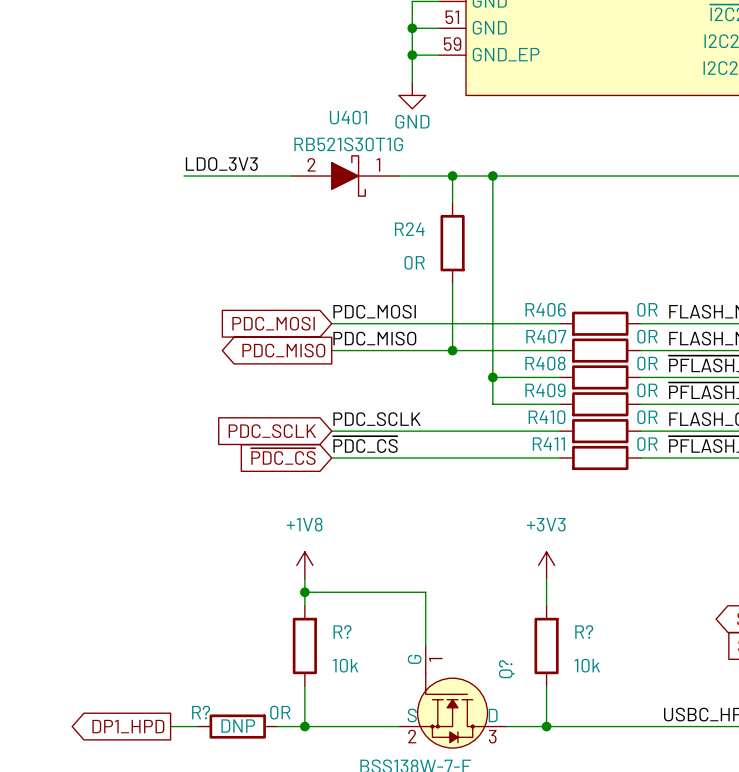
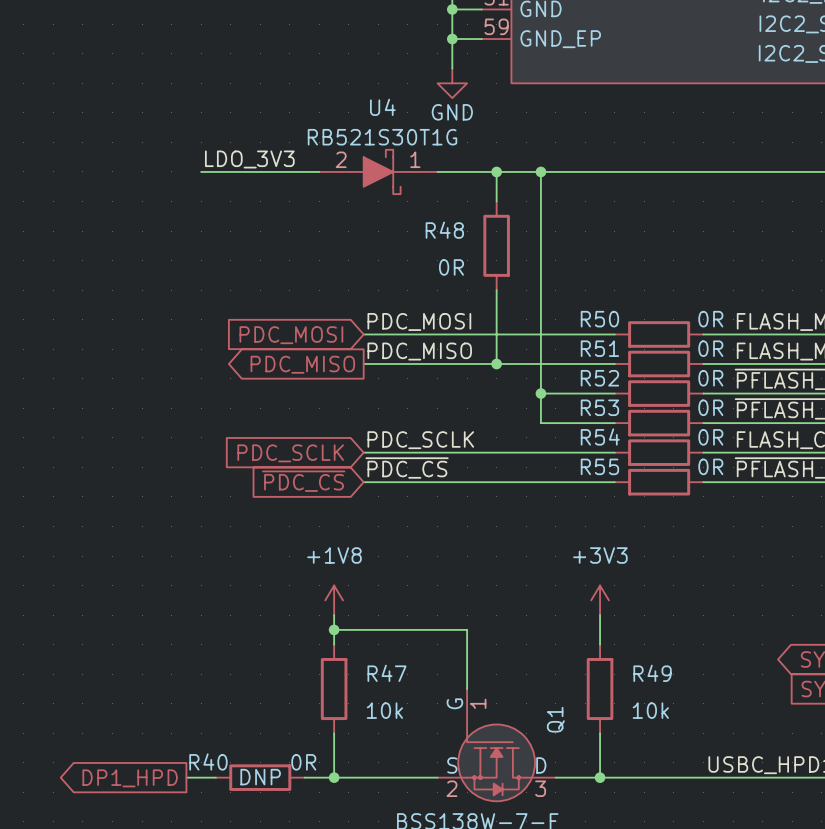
U401 name: U401 (348, 117) -> U4 (382, 107)
R24 name: R24 (409, 229) -> R48 (444, 230)
R406 name: R406 (545, 309) -> R50 (599, 319)
R407 name: R407 (546, 336) -> R51 (599, 348)
R408 name: R408 (545, 363) -> R52 (599, 378)
R409 name: R409 (545, 390) -> R53 (599, 407)
R410 name: R410 (547, 417) -> R54 (600, 436)
R411 name: R411 (548, 444) -> R55 (599, 466)
R? name: R? (342, 631) -> R47 (387, 673)
R? name: R? (584, 631) -> R49 (652, 673)
Q? name: Q? (506, 669) -> Q1 (555, 719)
R? name: R? (201, 712) -> R40 (208, 761)

